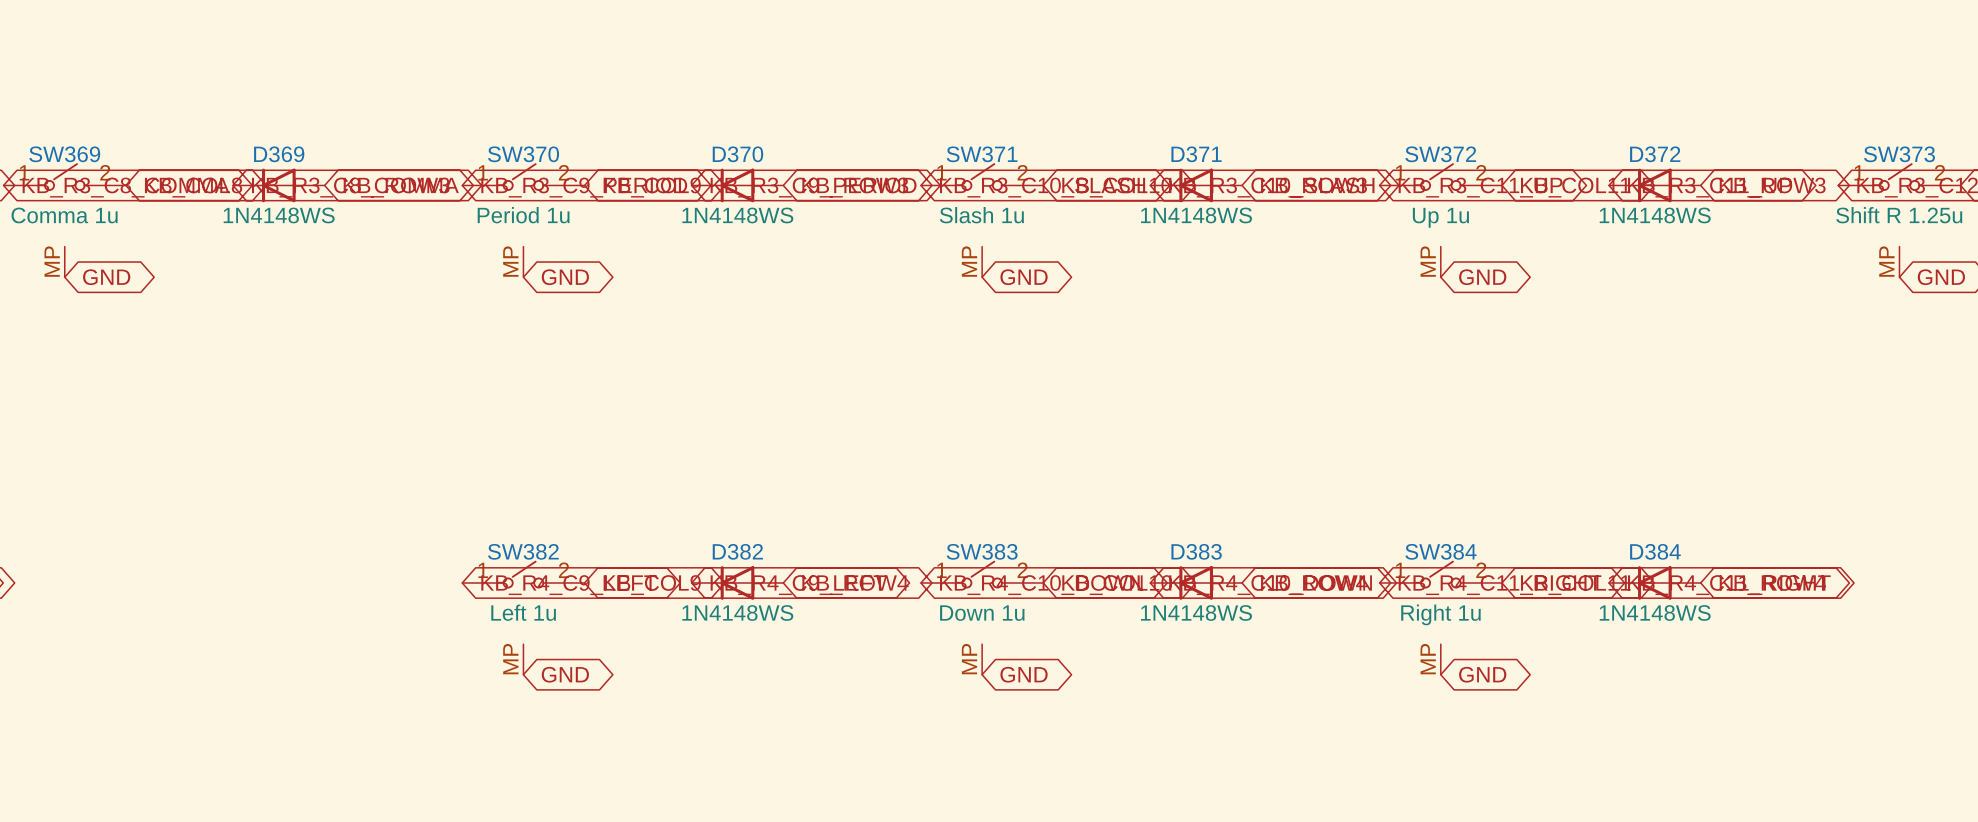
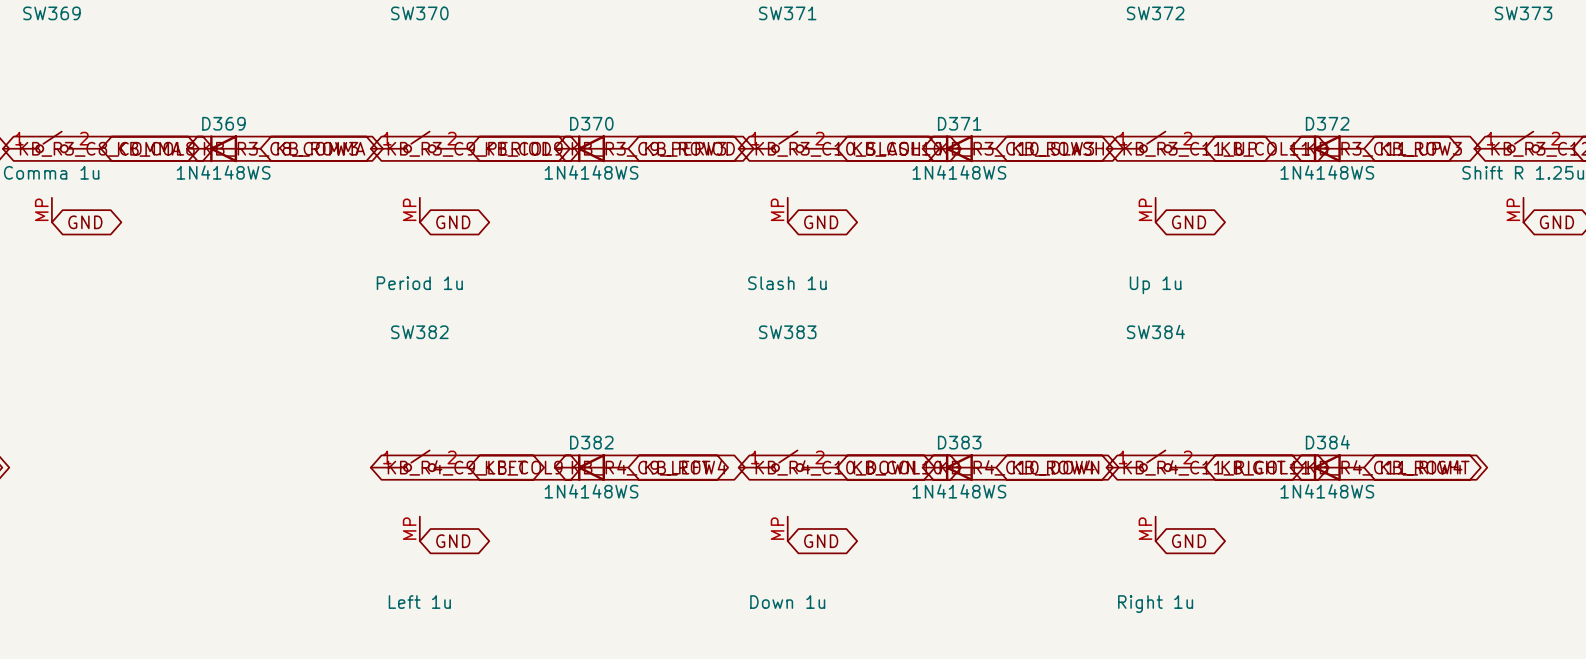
SW369 name position: SW369 (64, 154) -> SW369 (51, 13)
SW370 name position: SW370 (523, 154) -> SW370 (419, 13)
SW371 name position: SW371 (982, 154) -> SW371 (787, 13)
SW372 name position: SW372 (1440, 154) -> SW372 (1155, 13)
SW373 name position: SW373 (1899, 154) -> SW373 (1523, 13)
SW370 value position: Period 1u (523, 215) -> Period 1u (419, 283)
SW371 value position: Slash 1u (981, 215) -> Slash 1u (787, 283)
SW372 value position: Up 1u (1440, 217) -> Up 1u (1155, 285)
SW382 name position: SW382 (523, 551) -> SW382 (419, 332)
SW383 name position: SW383 (982, 551) -> SW383 (787, 332)
SW384 name position: SW384 (1440, 551) -> SW384 (1155, 331)
SW382 value position: Left 1u (523, 612) -> Left 1u (419, 602)
SW383 value position: Down 1u (982, 613) -> Down 1u (787, 602)
SW384 value position: Right 1u (1440, 614) -> Right 1u (1155, 604)

